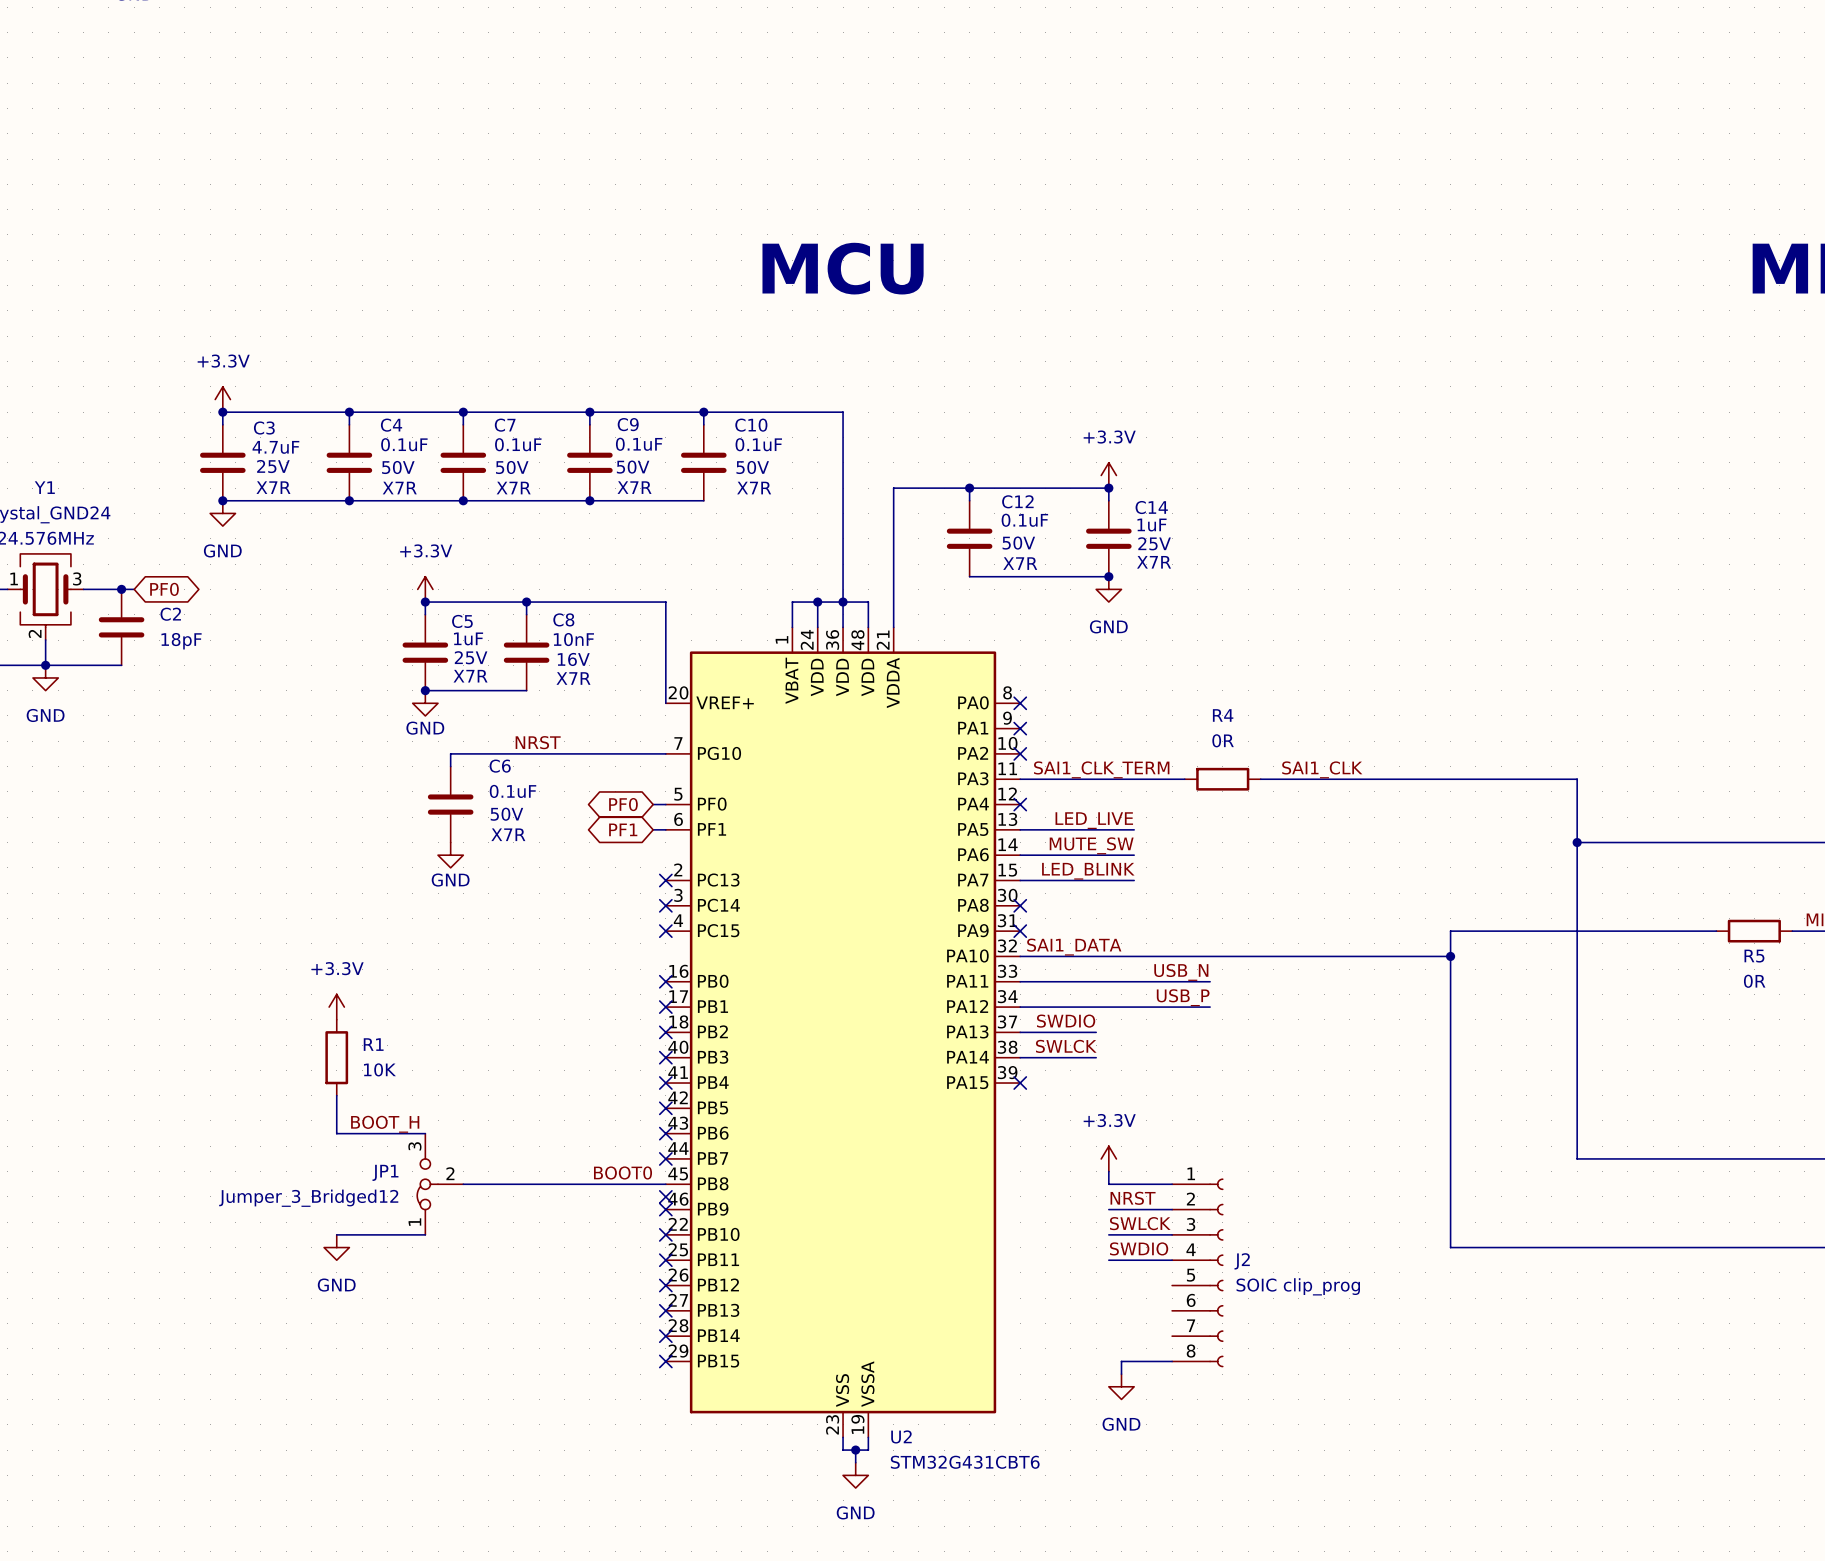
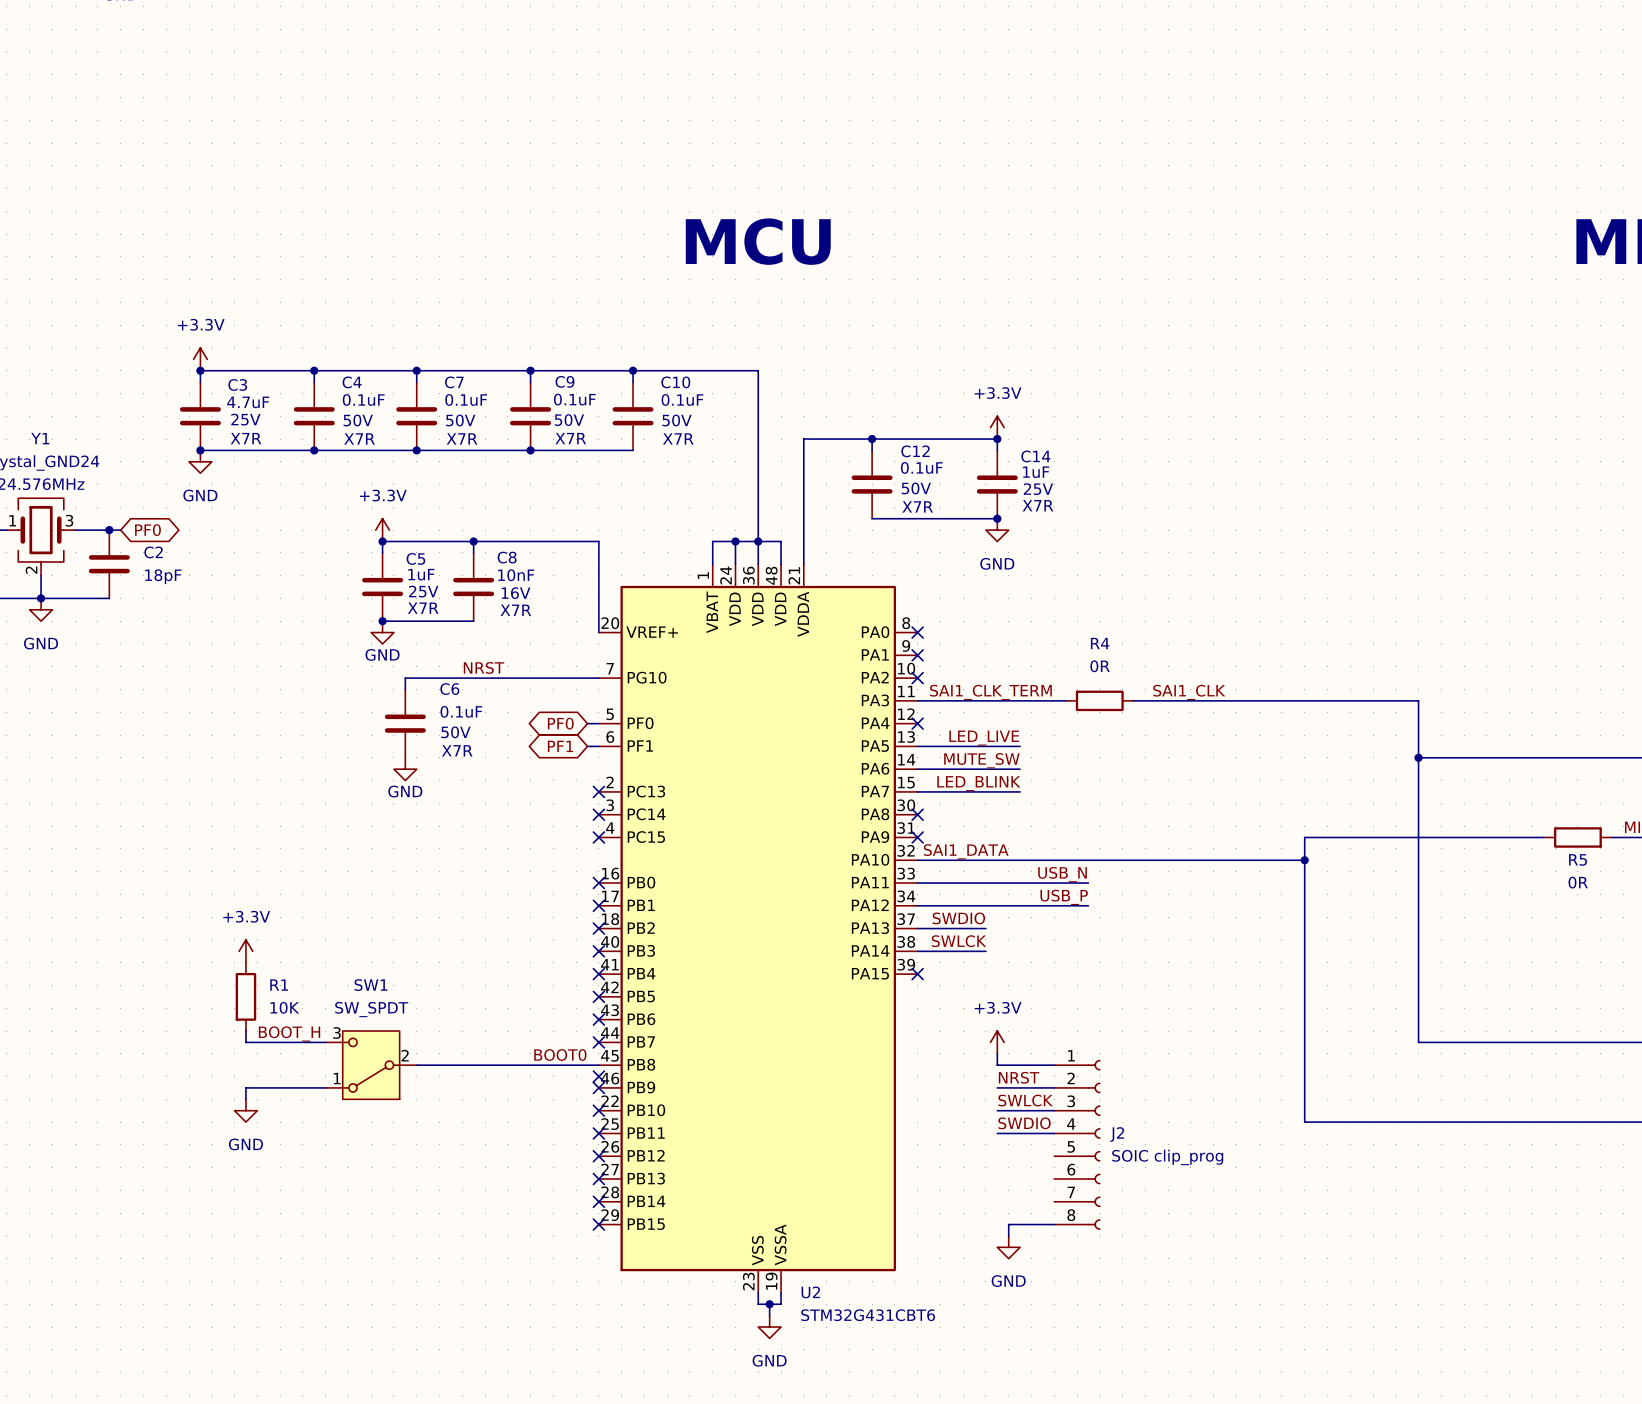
power symbol position: +3.3V (336, 1007) -> +3.3V (245, 951)
R1 position: (336, 1057) -> (245, 996)
wire: (336, 1095) (336, 1133) (425, 1133) -> none
label position: BOOT_H (385, 1124) -> BOOT_H (289, 1033)
wire: none -> (245, 1031) (245, 1042) (325, 1042)
SW1: none -> SW_SPDT (371, 1065)
JP1: Jumper_3_Bridged12 (440, 1184) -> none
wire: none -> (325, 1087) (245, 1087) (245, 1099)
wire: (336, 1234) (425, 1234) -> none
power symbol position: GND (336, 1247) -> GND (245, 1110)

